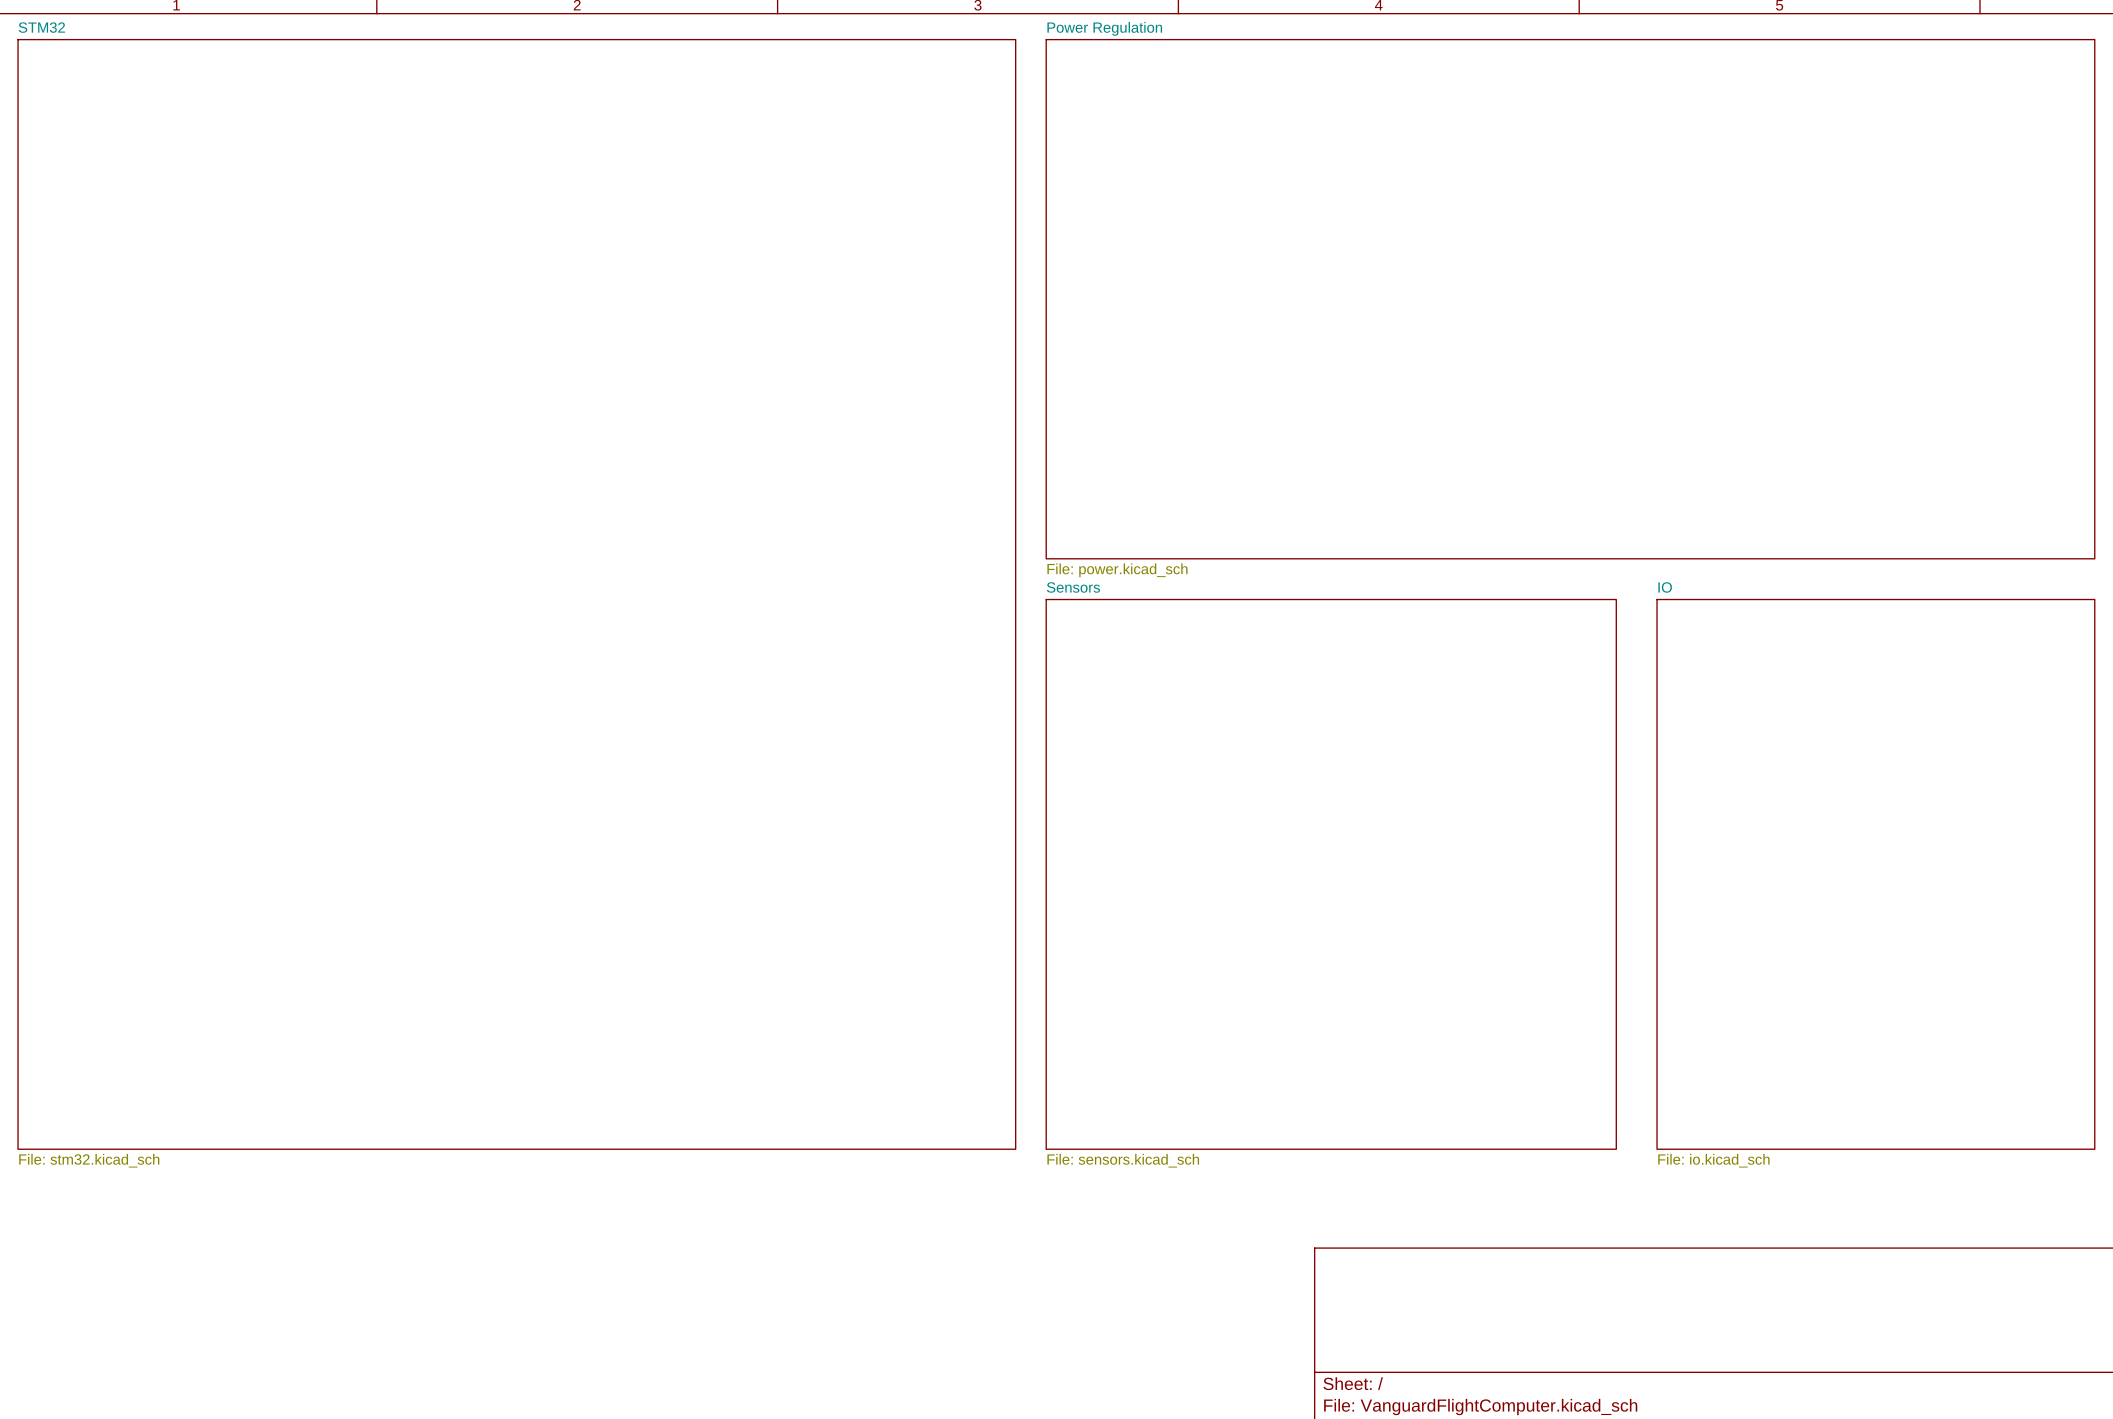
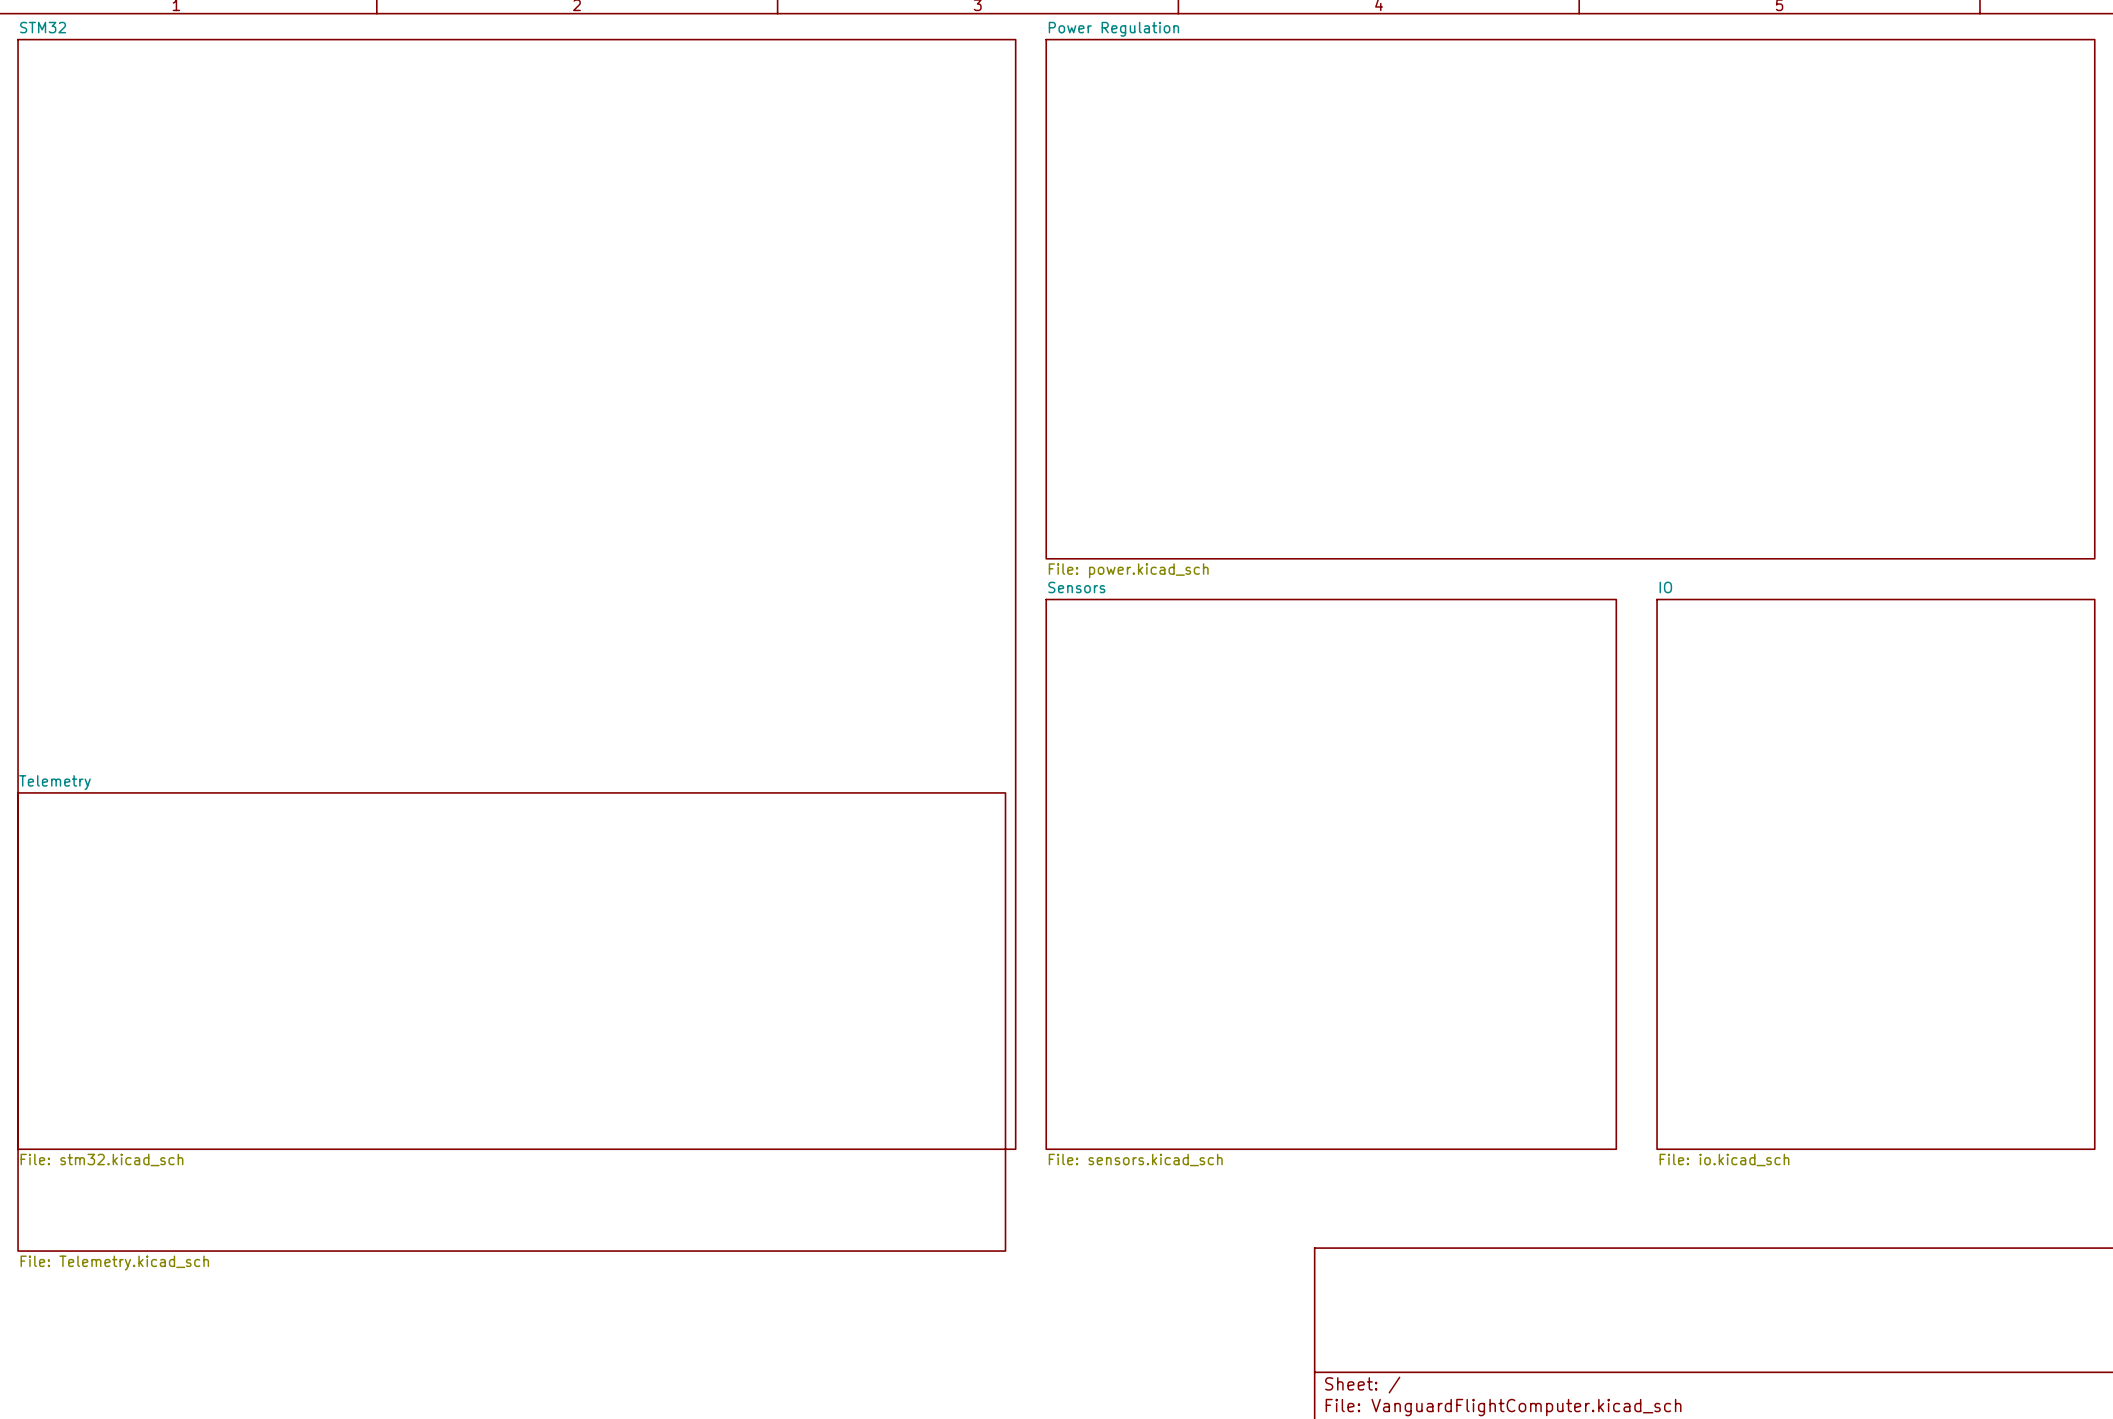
sheet Telemetry: none -> File: Telemetry.kicad_sch (511, 1021)

